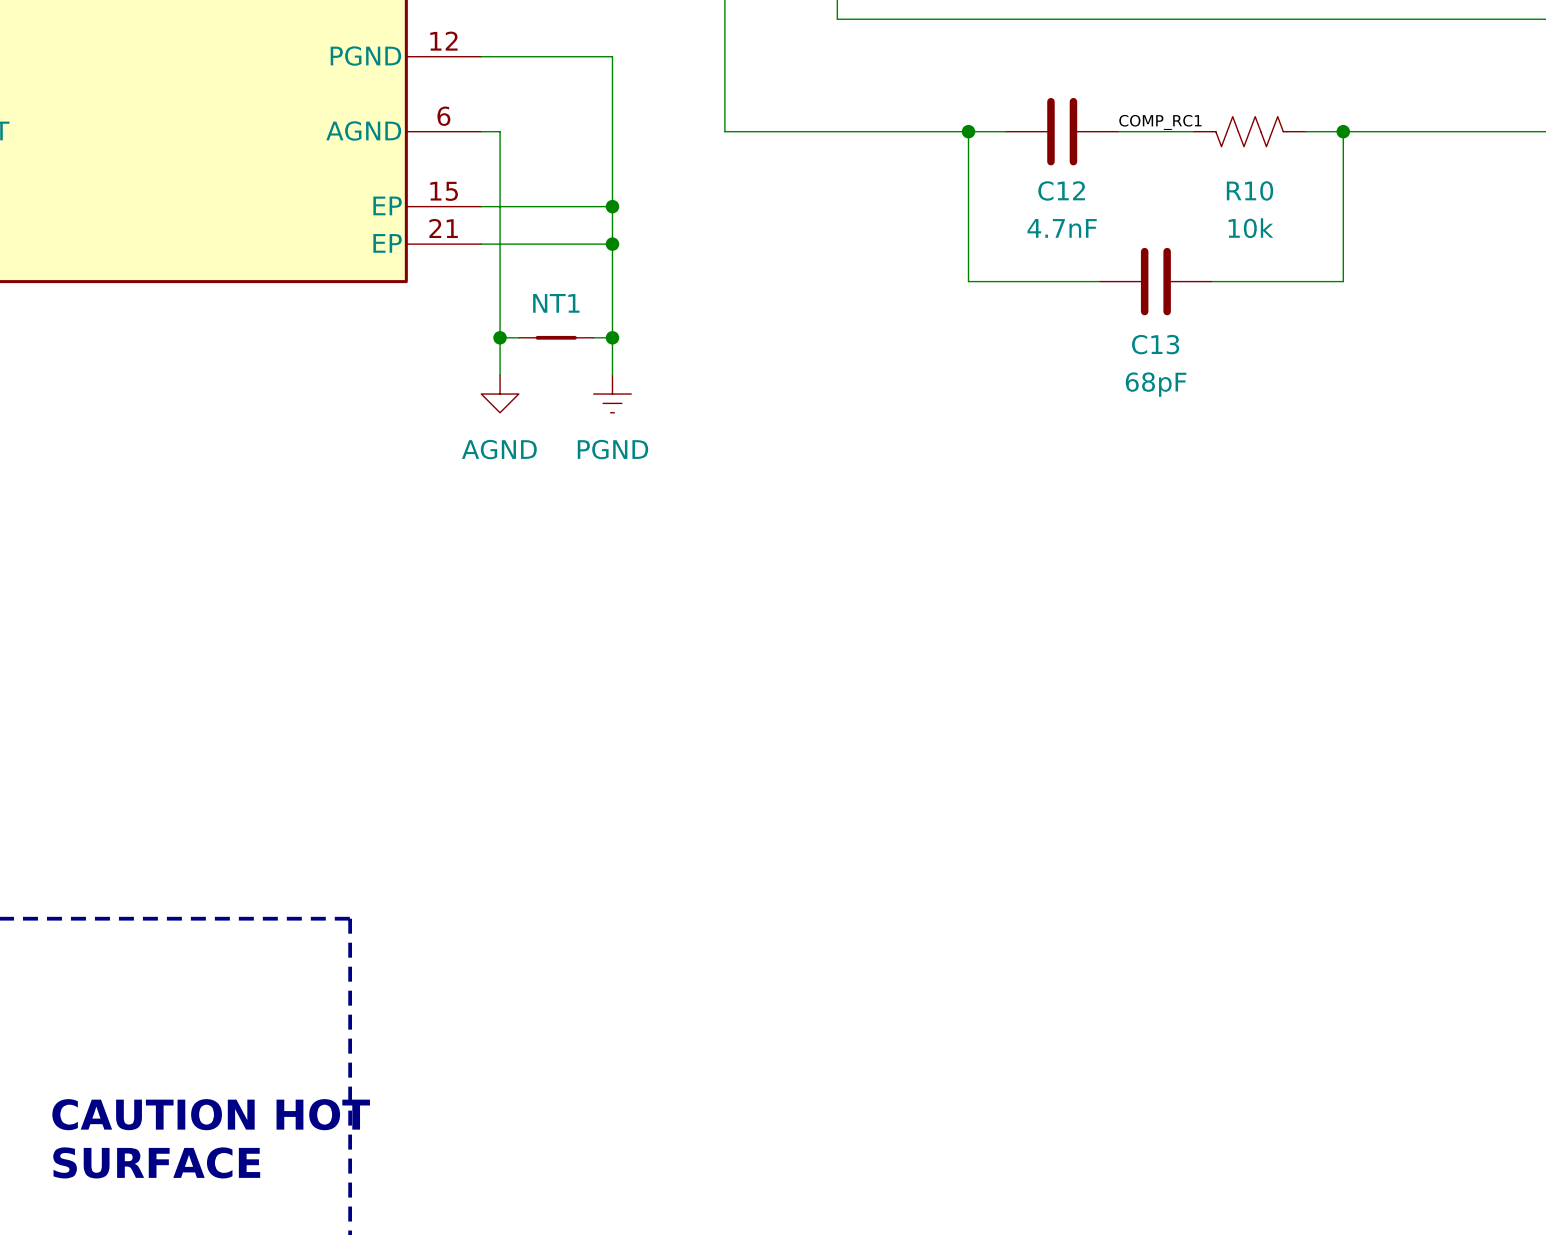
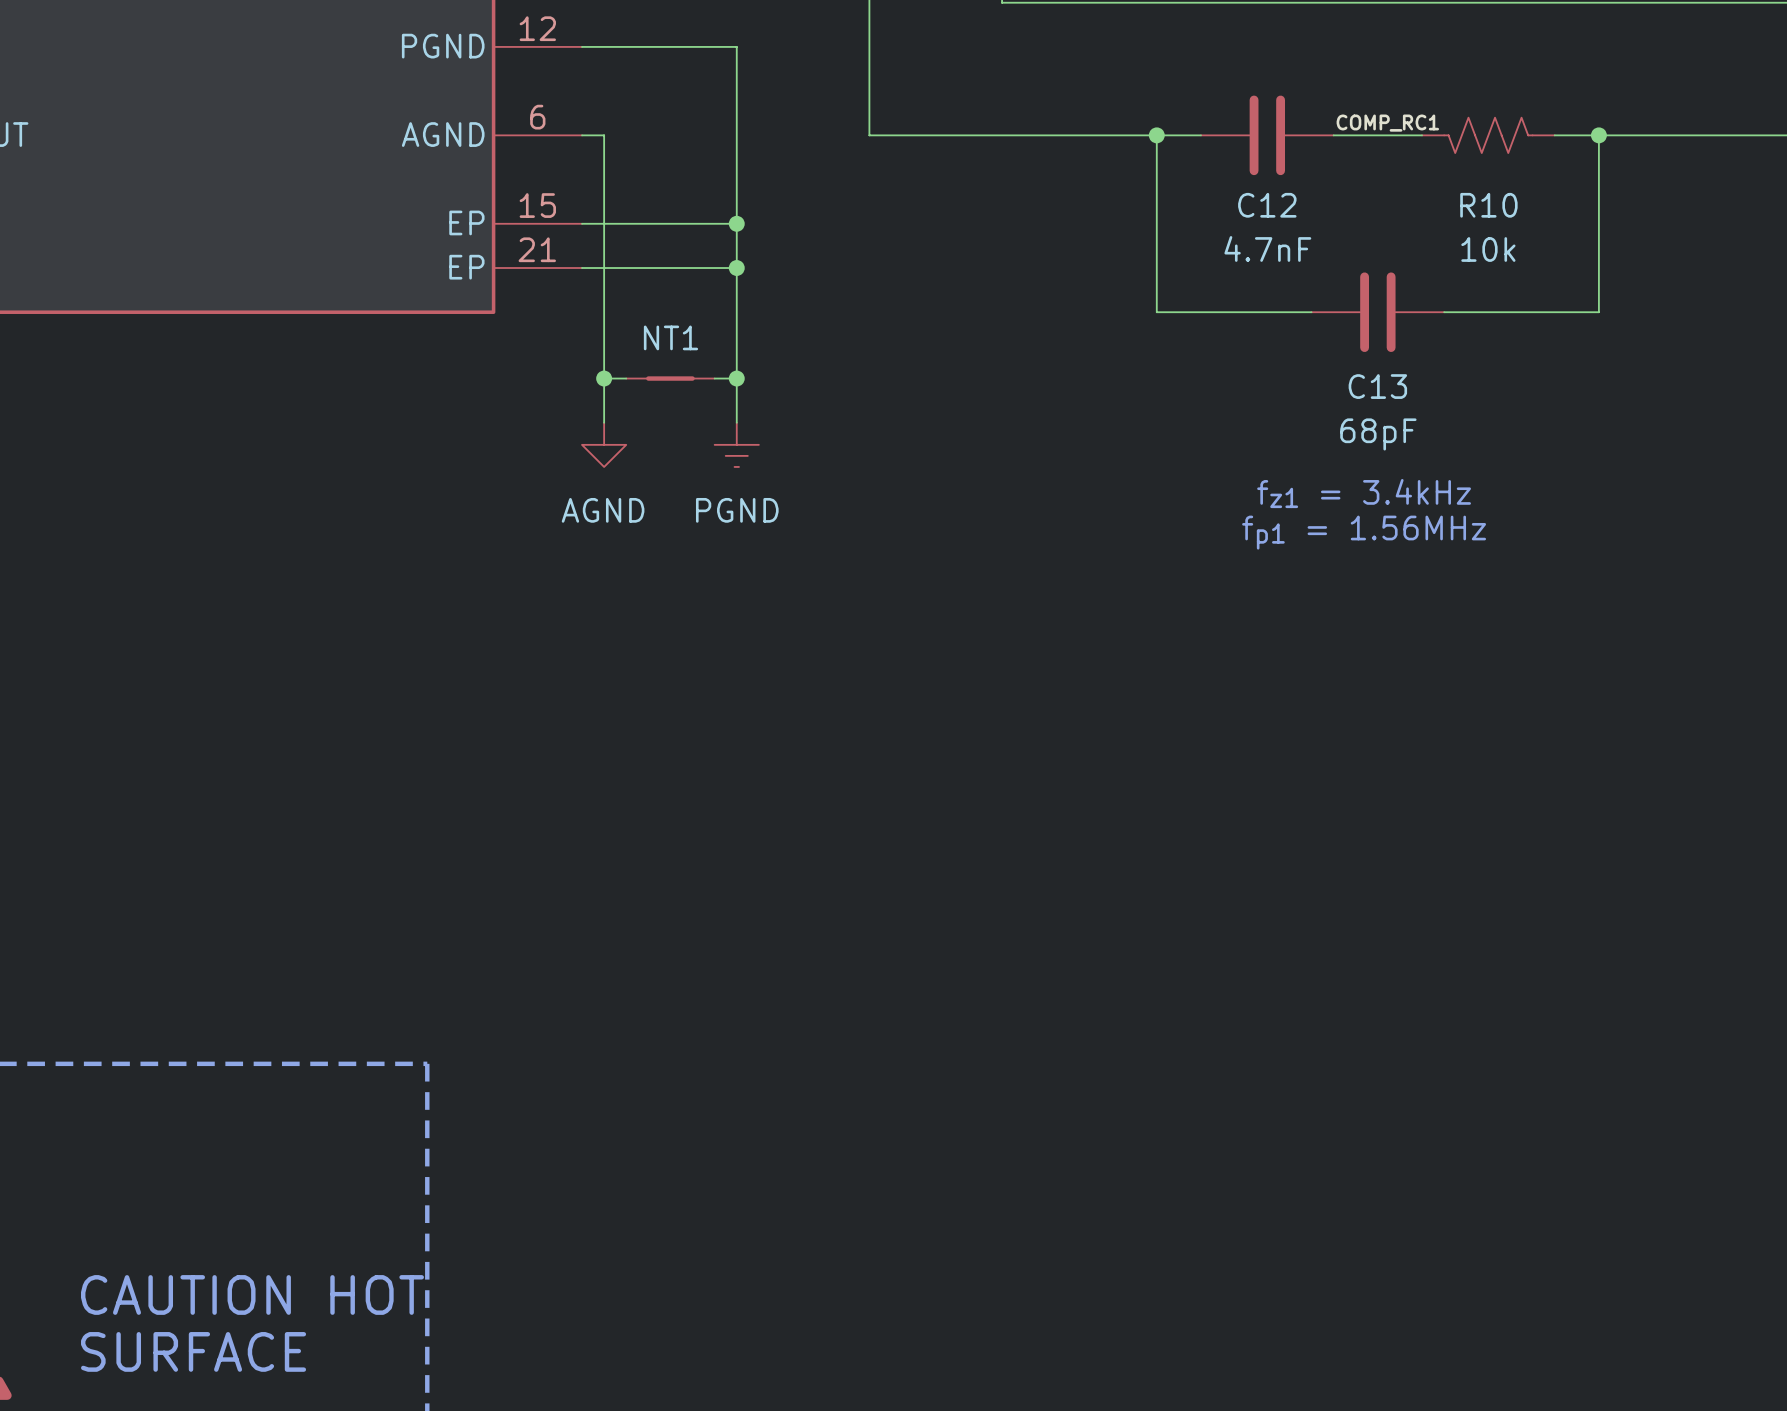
text: none -> fz1 = 3.4kHz (1364, 493)
text: none -> fp1 = 1.56MHz (1364, 532)

